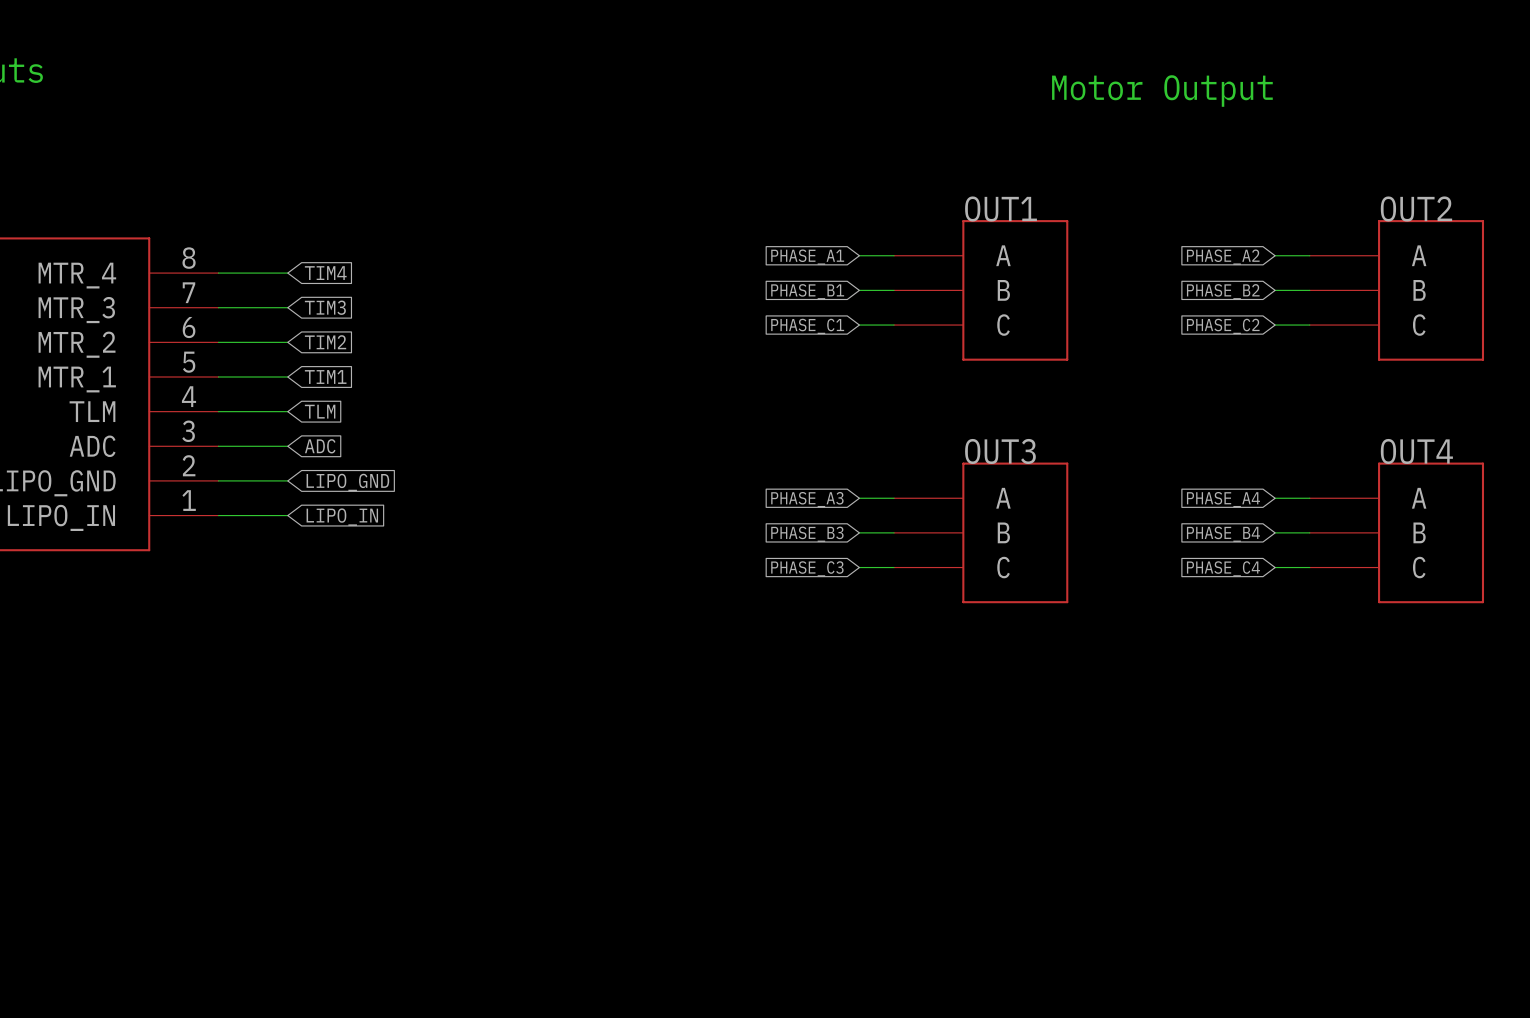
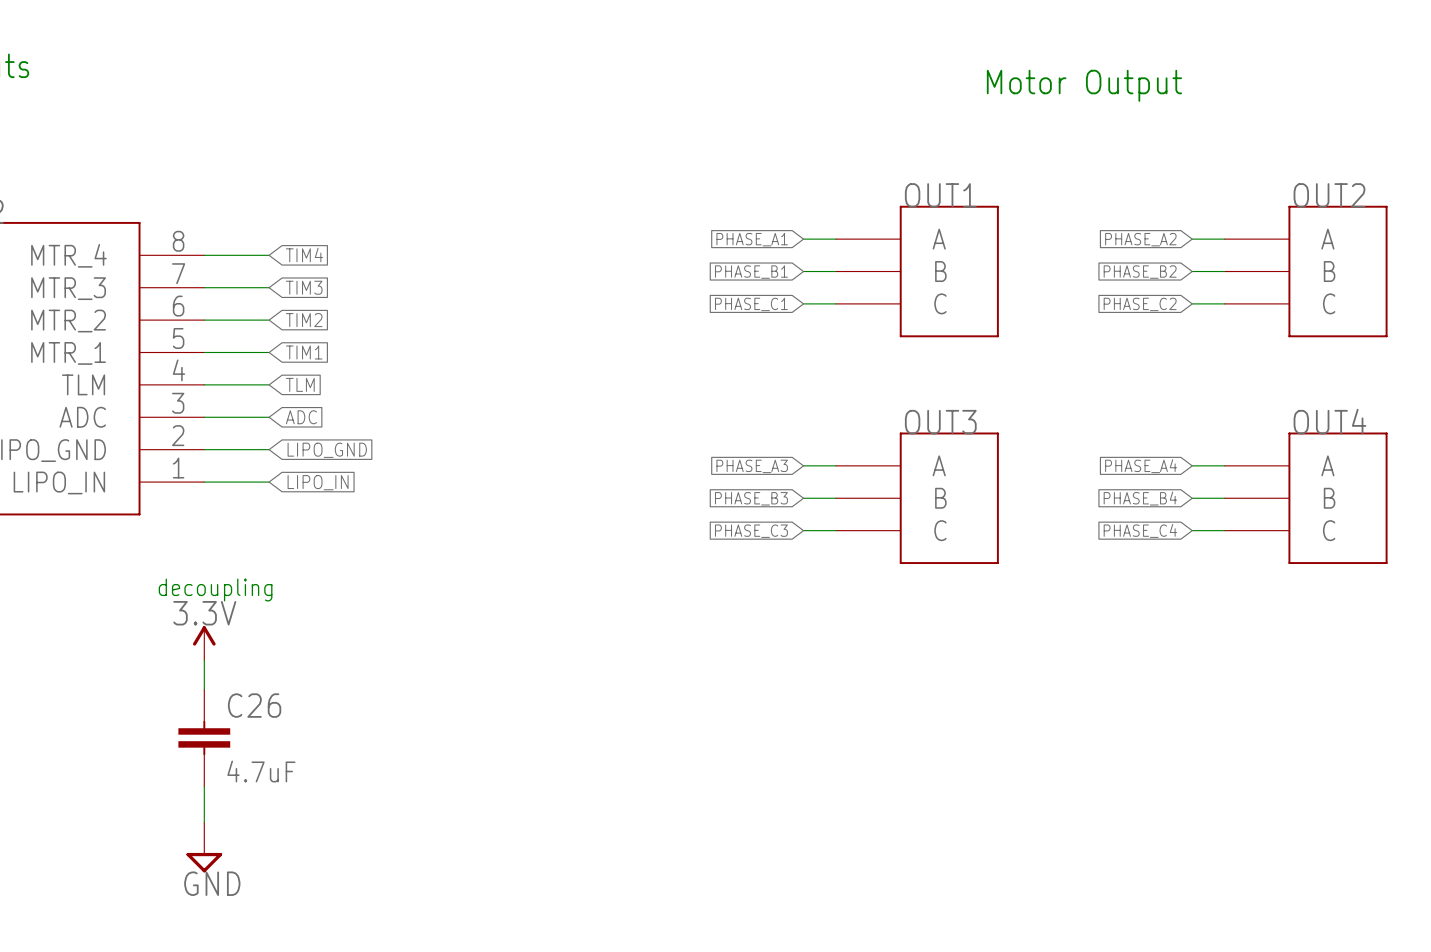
text: none -> decoupling (215, 590)
power symbol: none -> 3.3V (204, 643)
wire: none -> (204, 660) (204, 689)
C26: none -> 4.7uF (204, 737)
wire: none -> (204, 786) (204, 822)
power symbol: none -> GND (204, 847)

